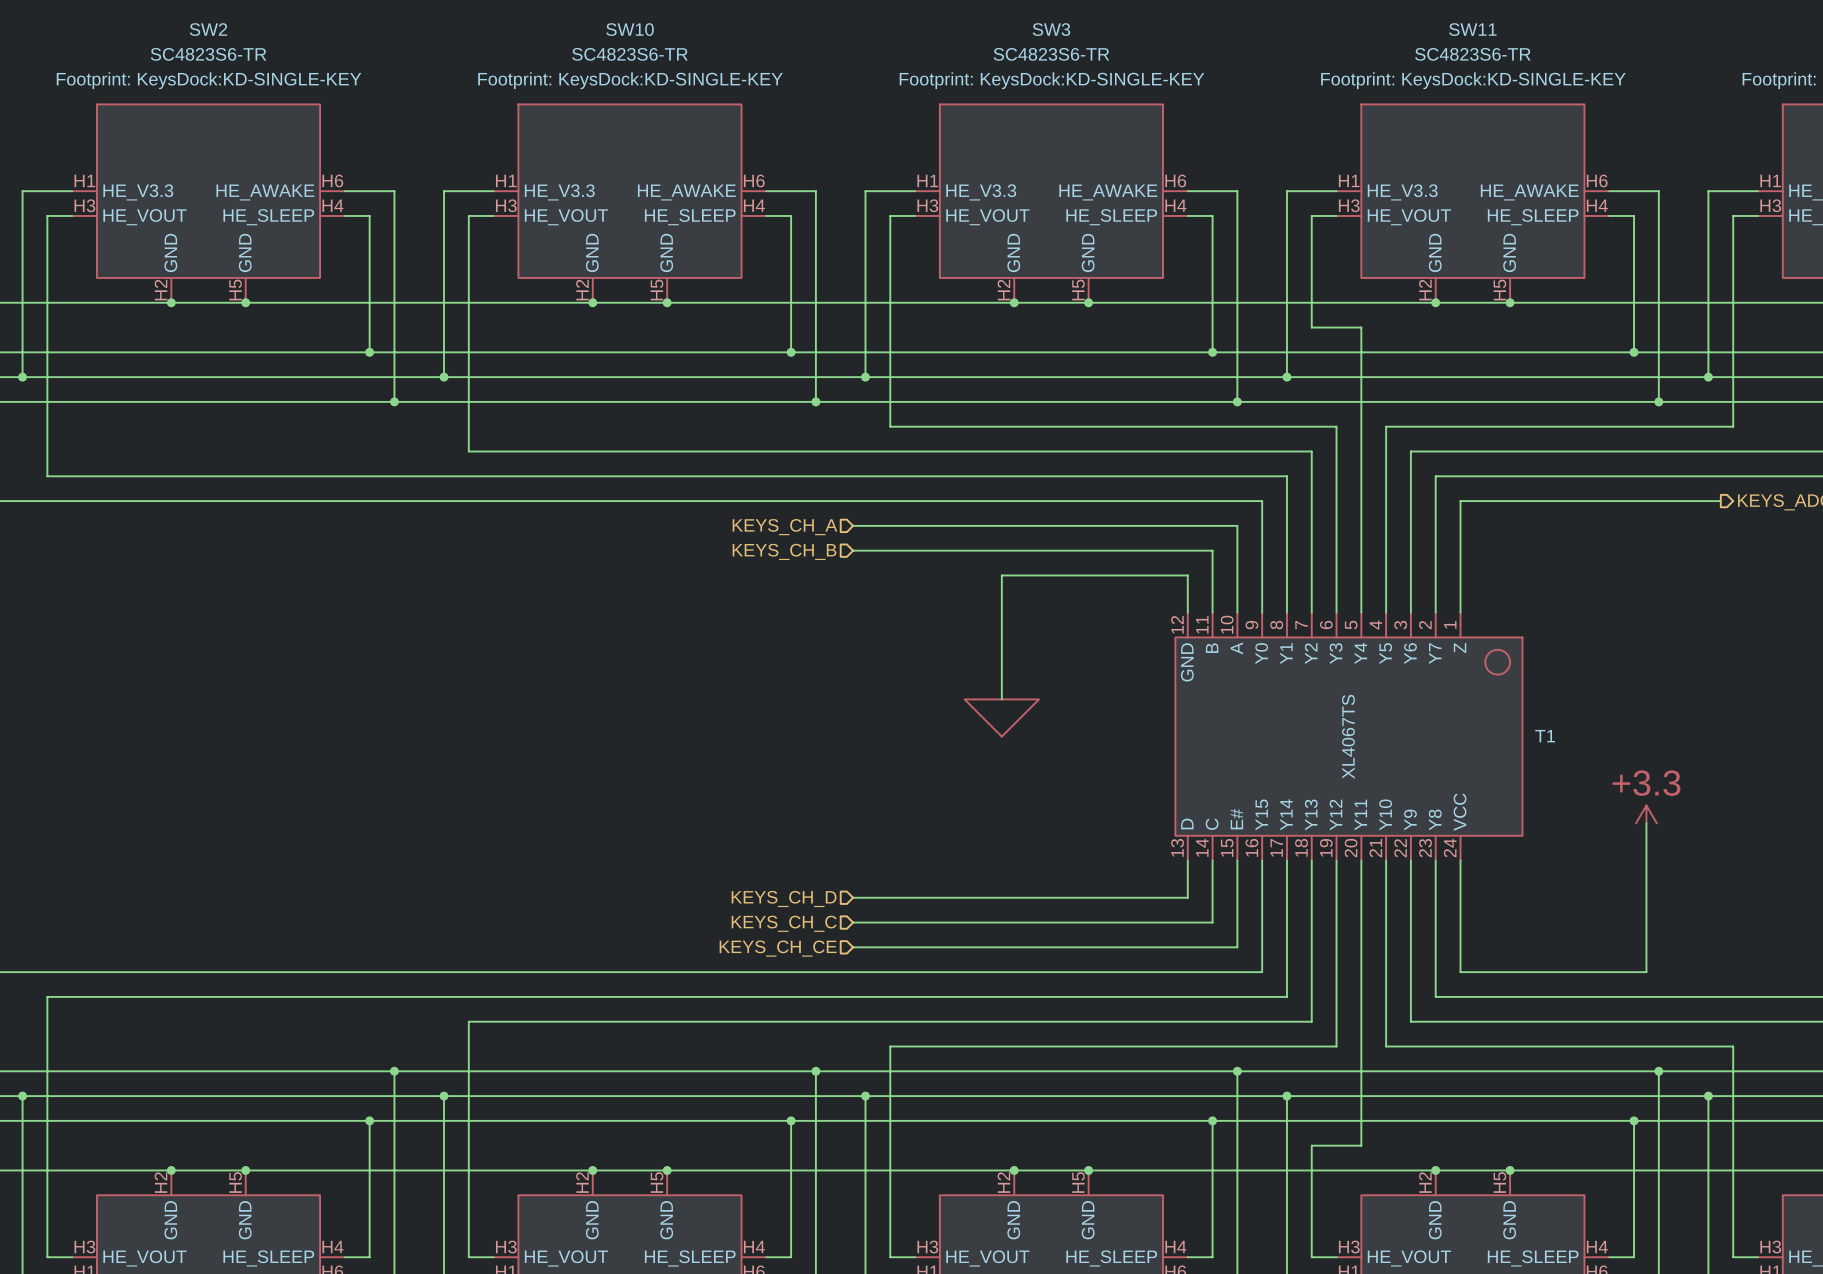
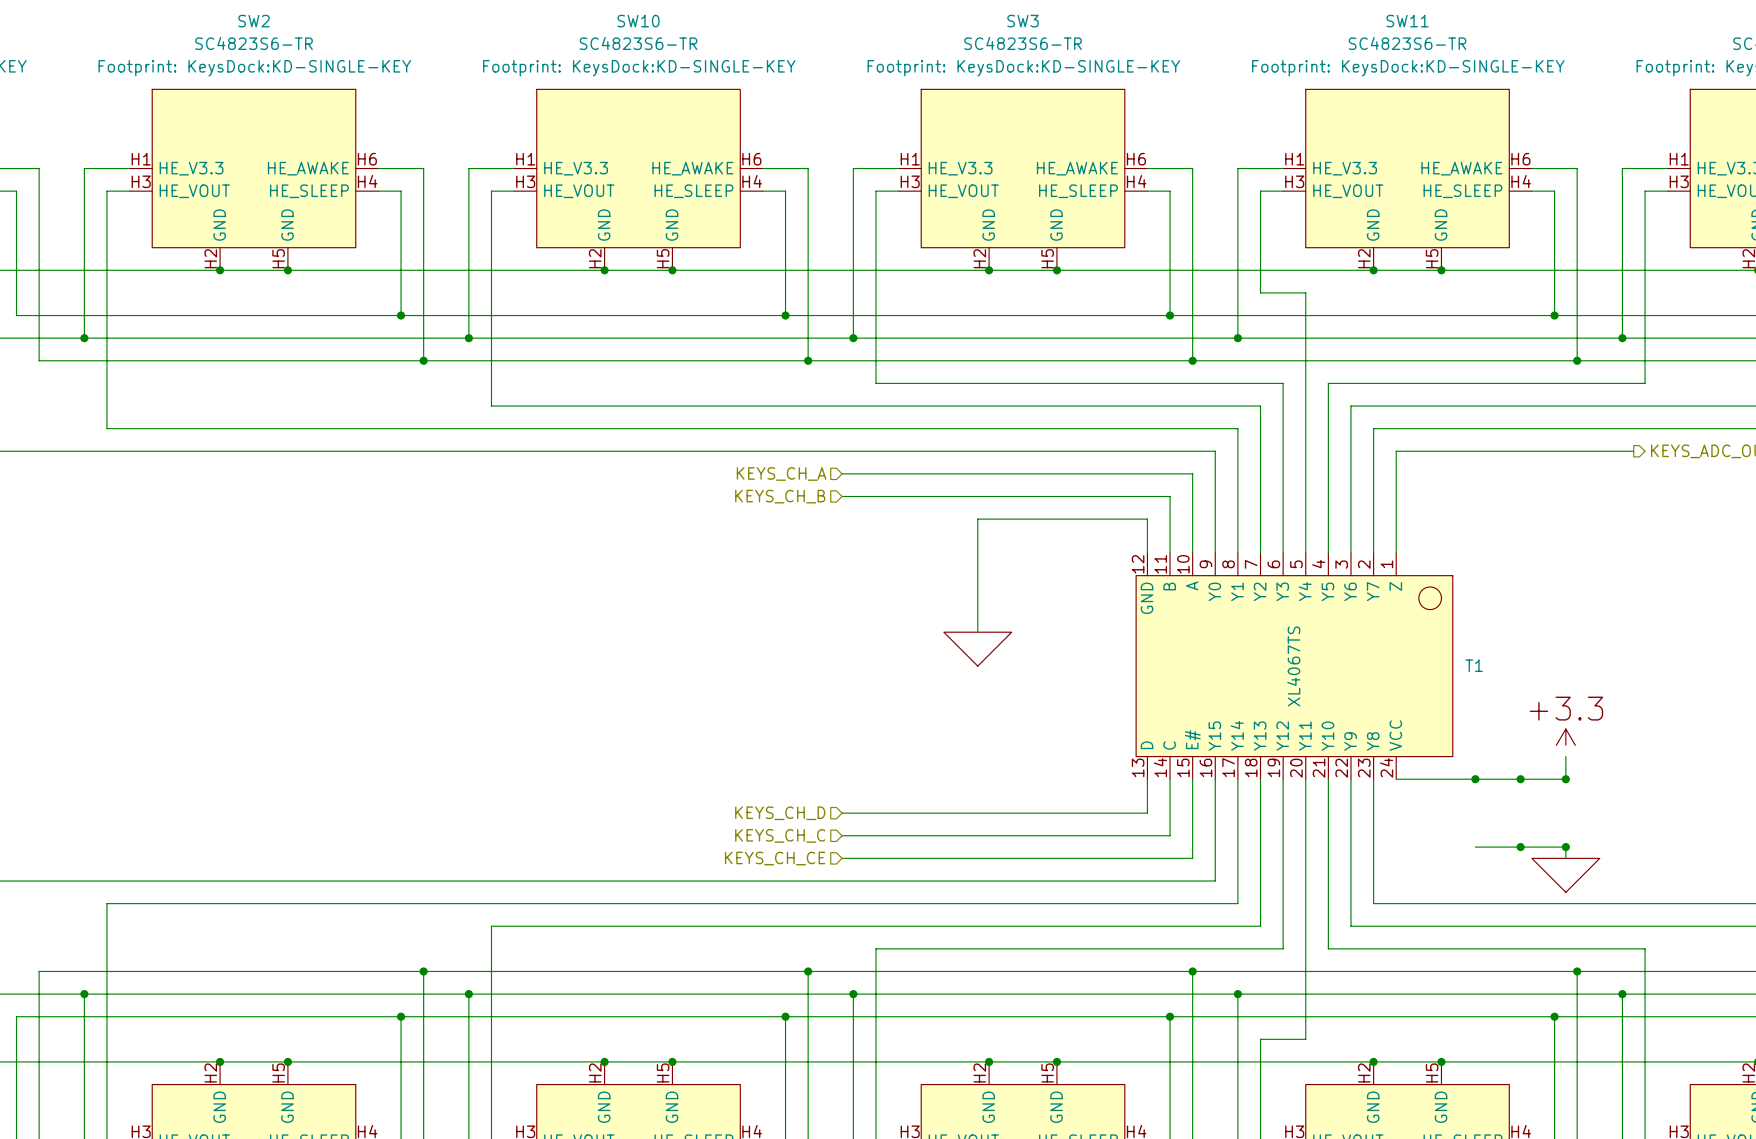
wire: (1646, 823) (1646, 835) -> none
wire: (1460, 860) (1460, 972) (1646, 972) (1646, 947) -> (1396, 779) (1565, 779)
junction: none -> (1475, 779)
junction: none -> (1520, 779)
wire: (1646, 860) (1646, 934) -> (1475, 847) (1565, 847)
junction: none -> (1565, 779)
junction: none -> (1520, 847)
junction: none -> (1565, 847)
power symbol: none -> (1565, 875)

